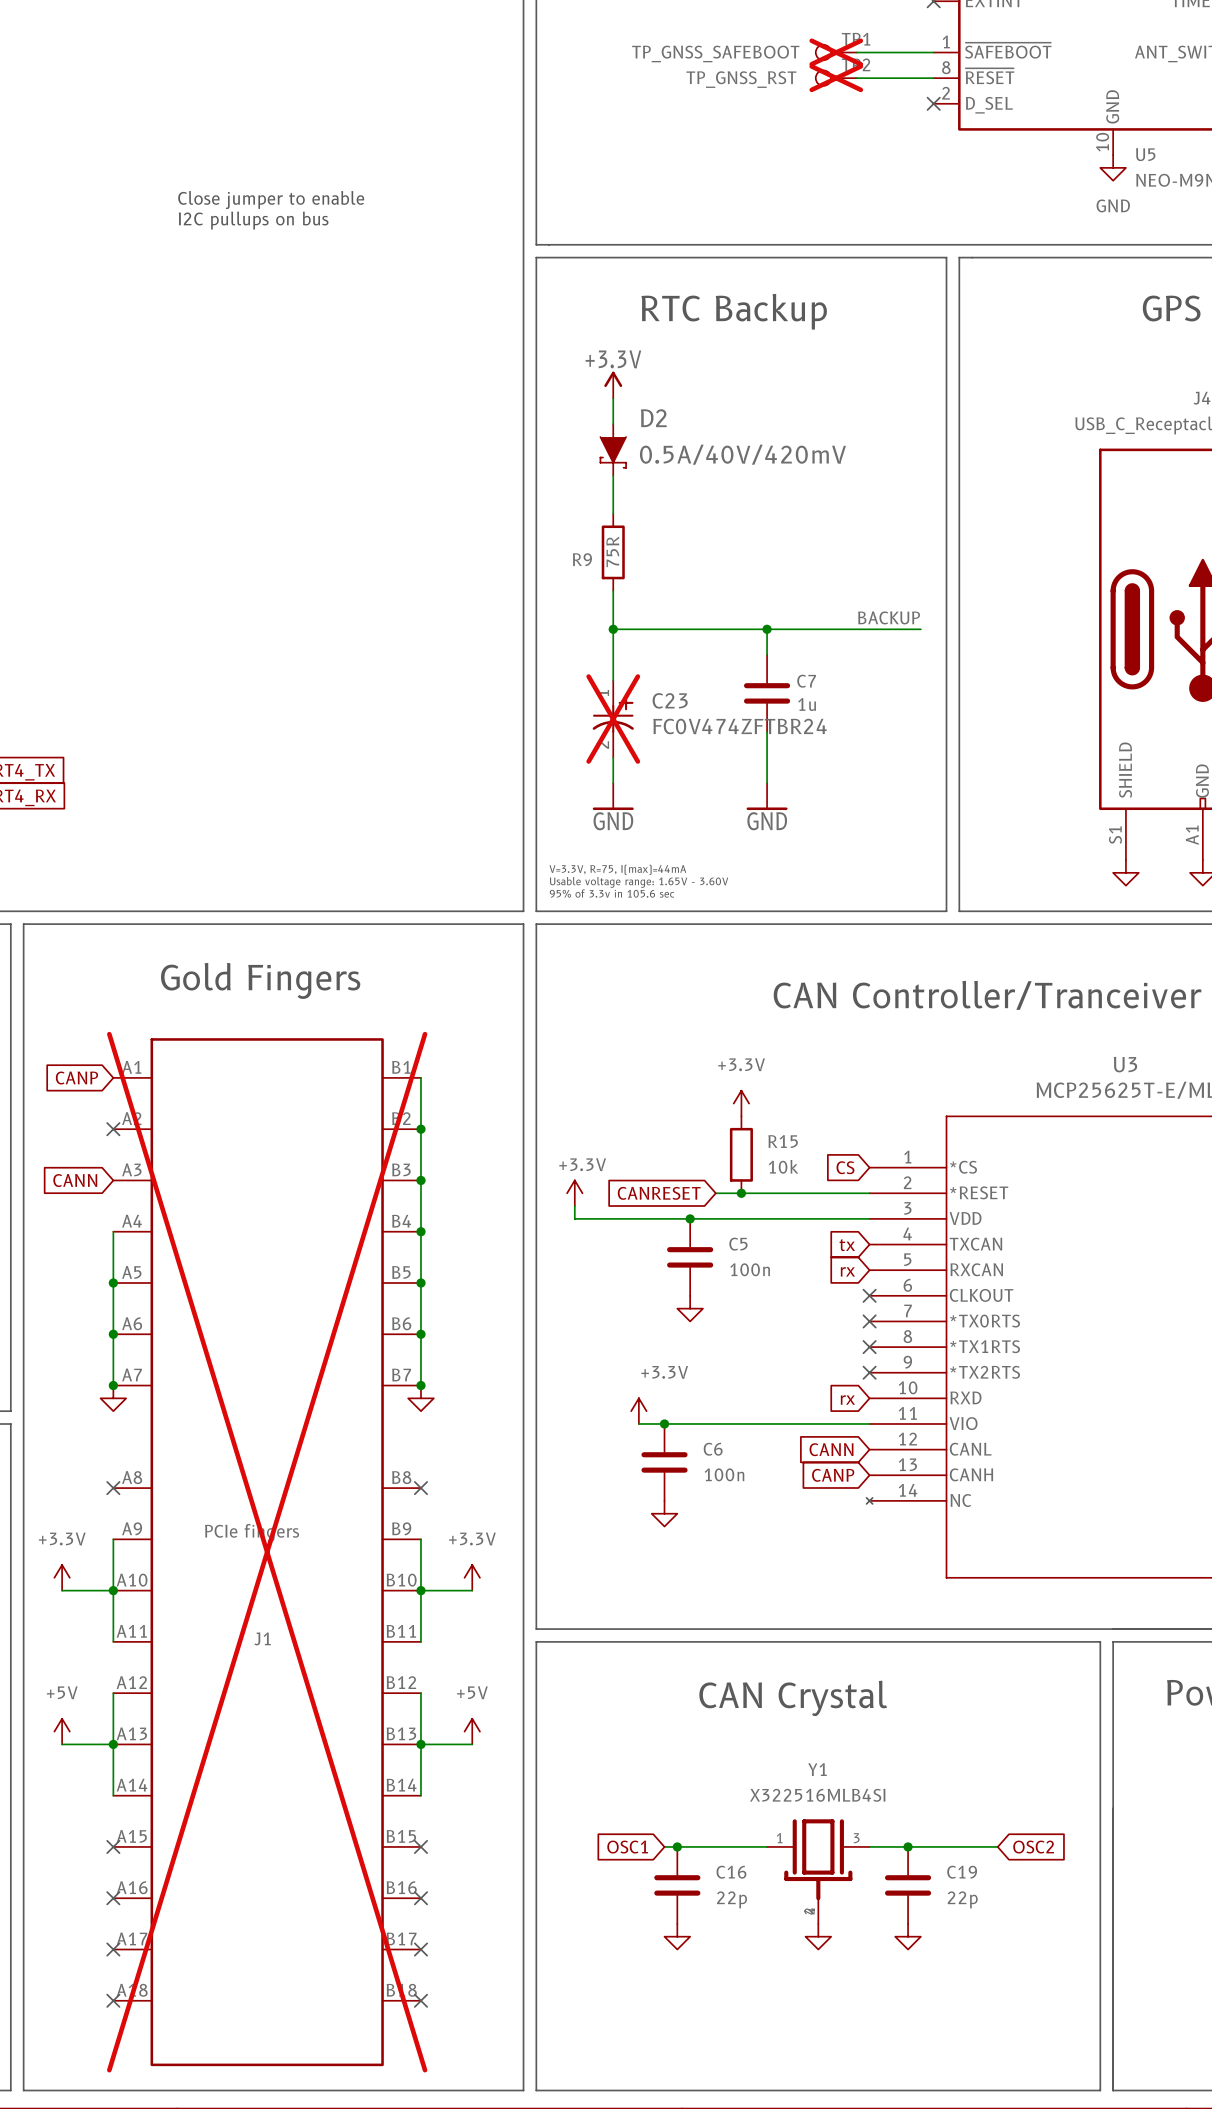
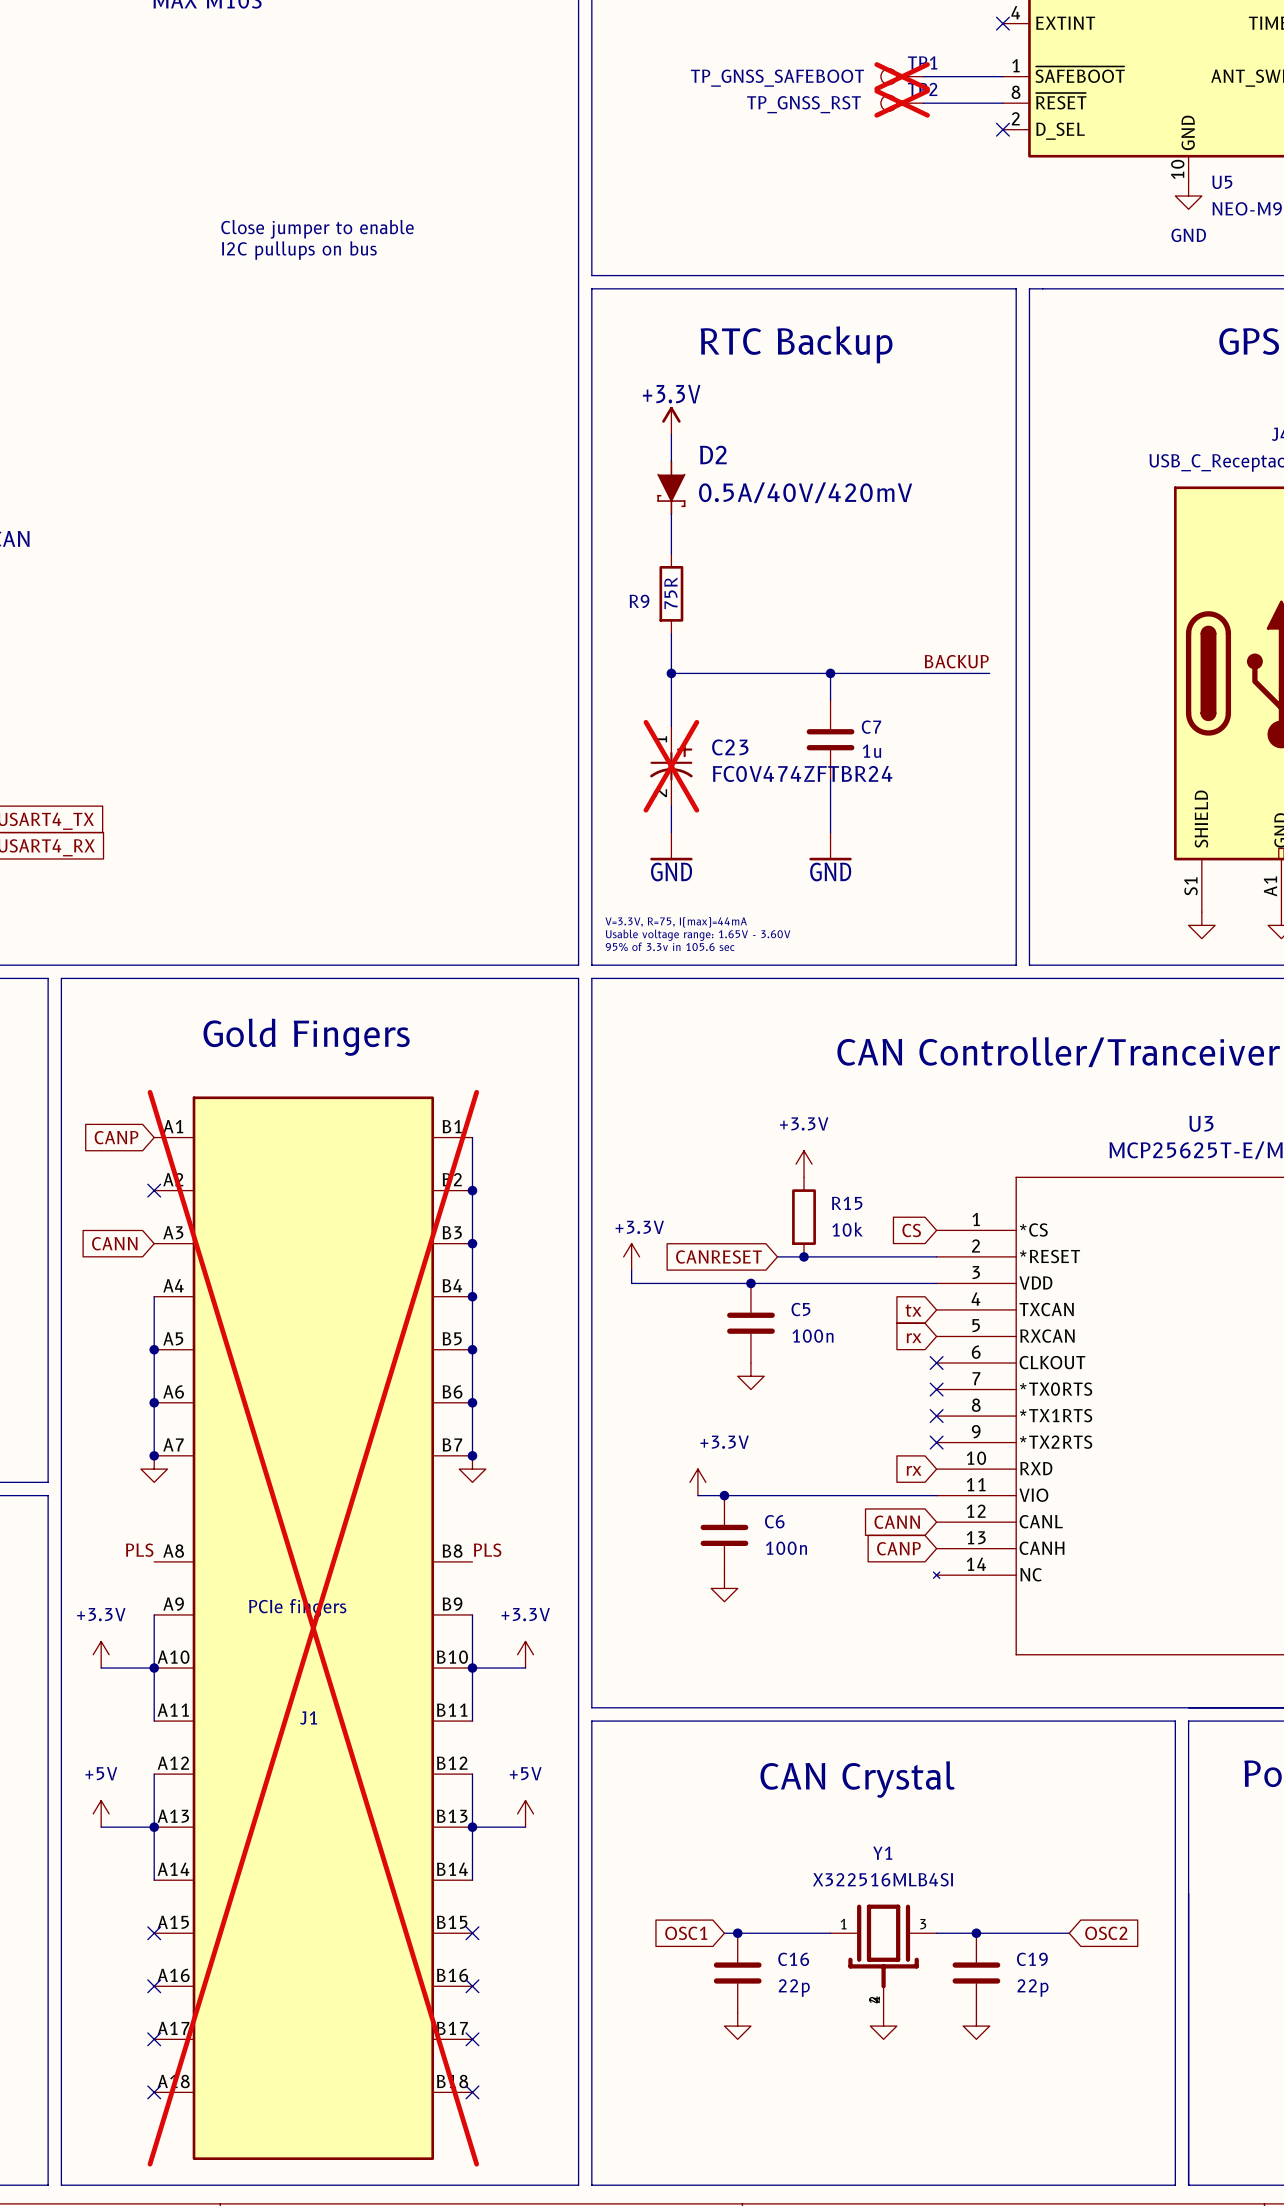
label: none -> PLS (139, 1550)
label: none -> PLS (487, 1550)
no-connect mark: (113, 1488) -> none
no-connect mark: (420, 1488) -> none

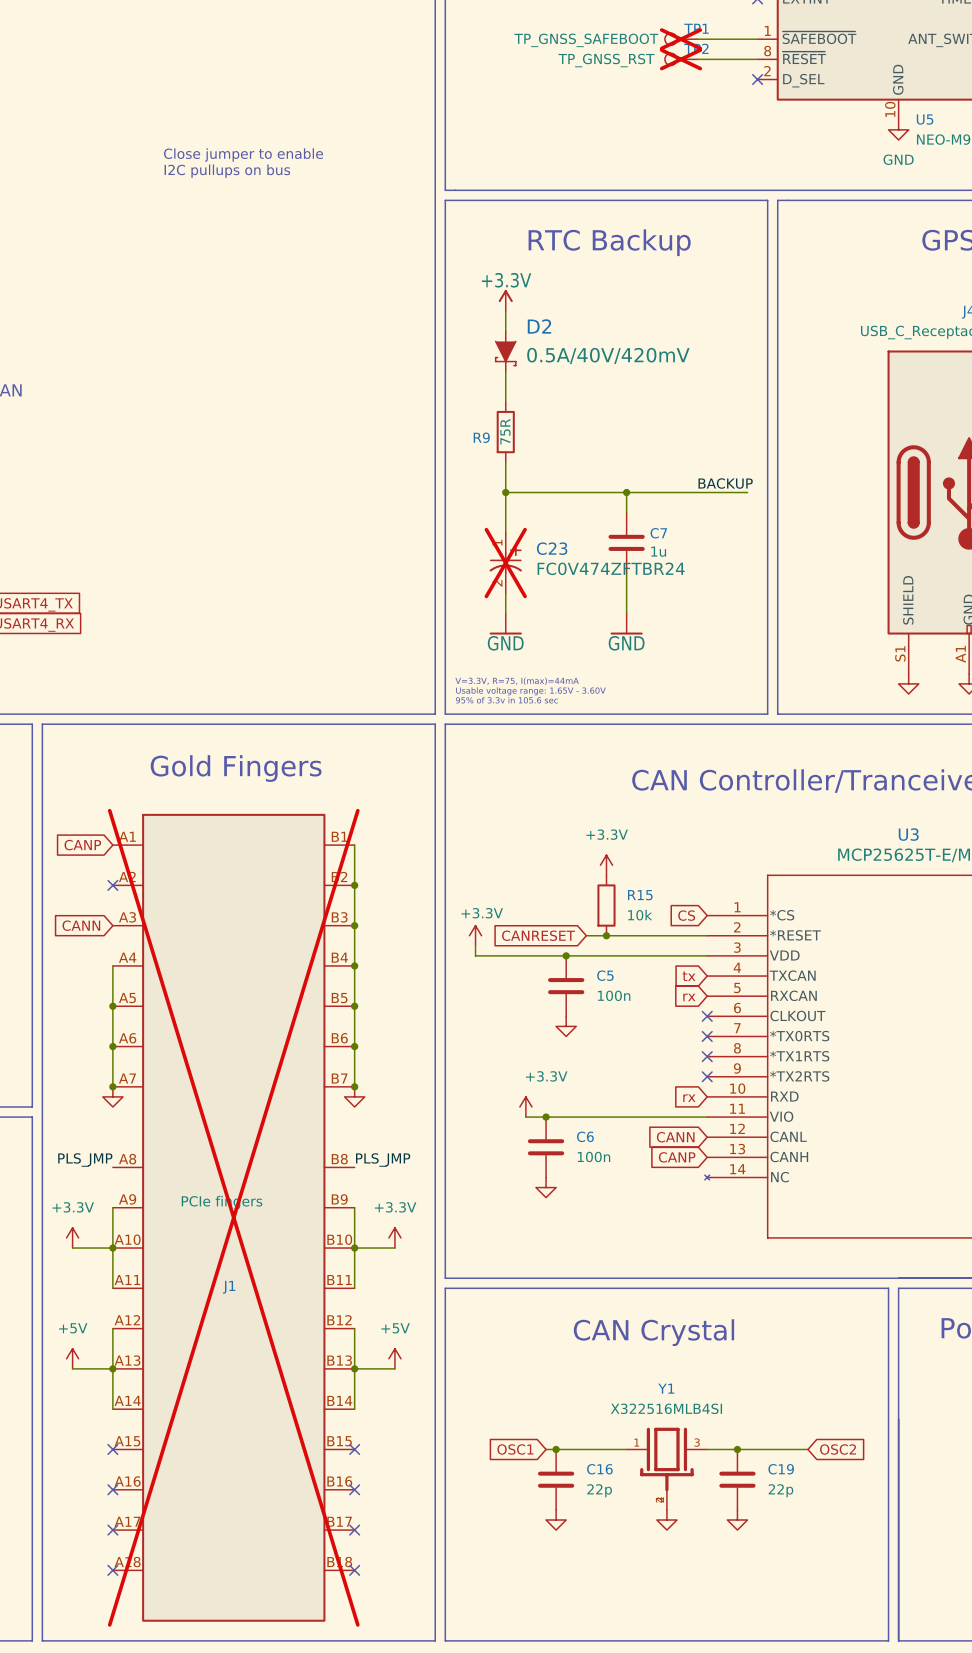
label: PLS (139, 1550) -> PLS_JMP (85, 1159)
label: PLS (487, 1550) -> PLS_JMP (383, 1159)

